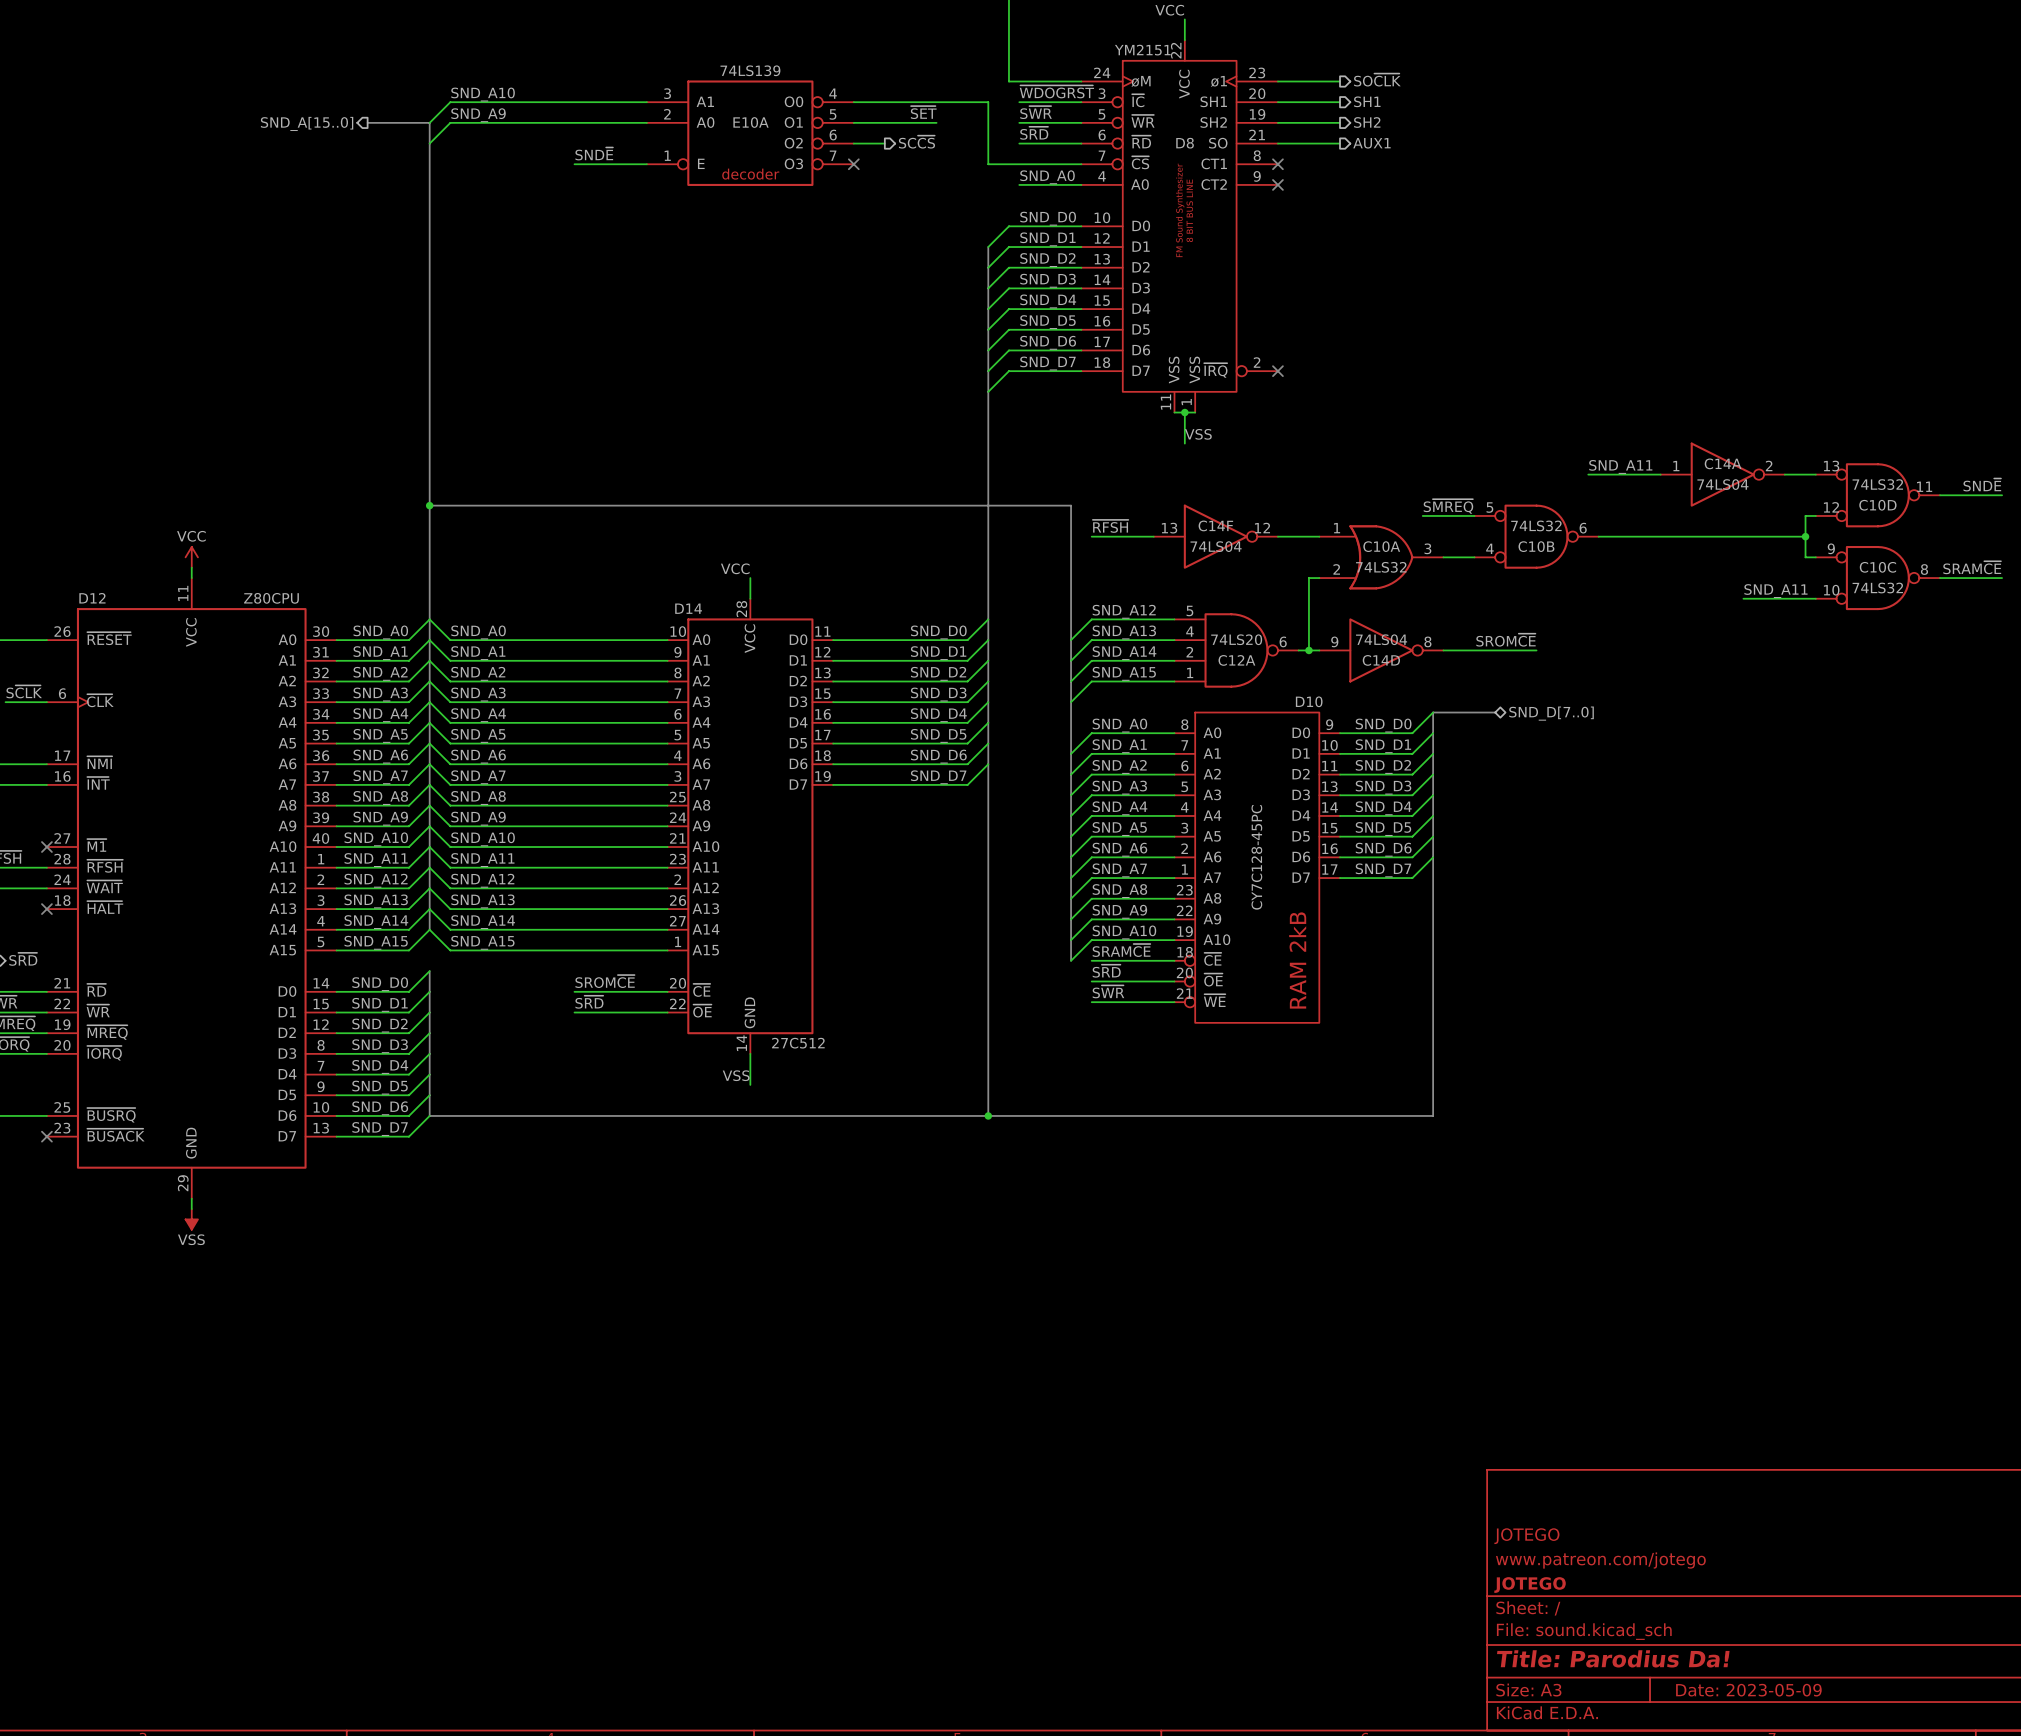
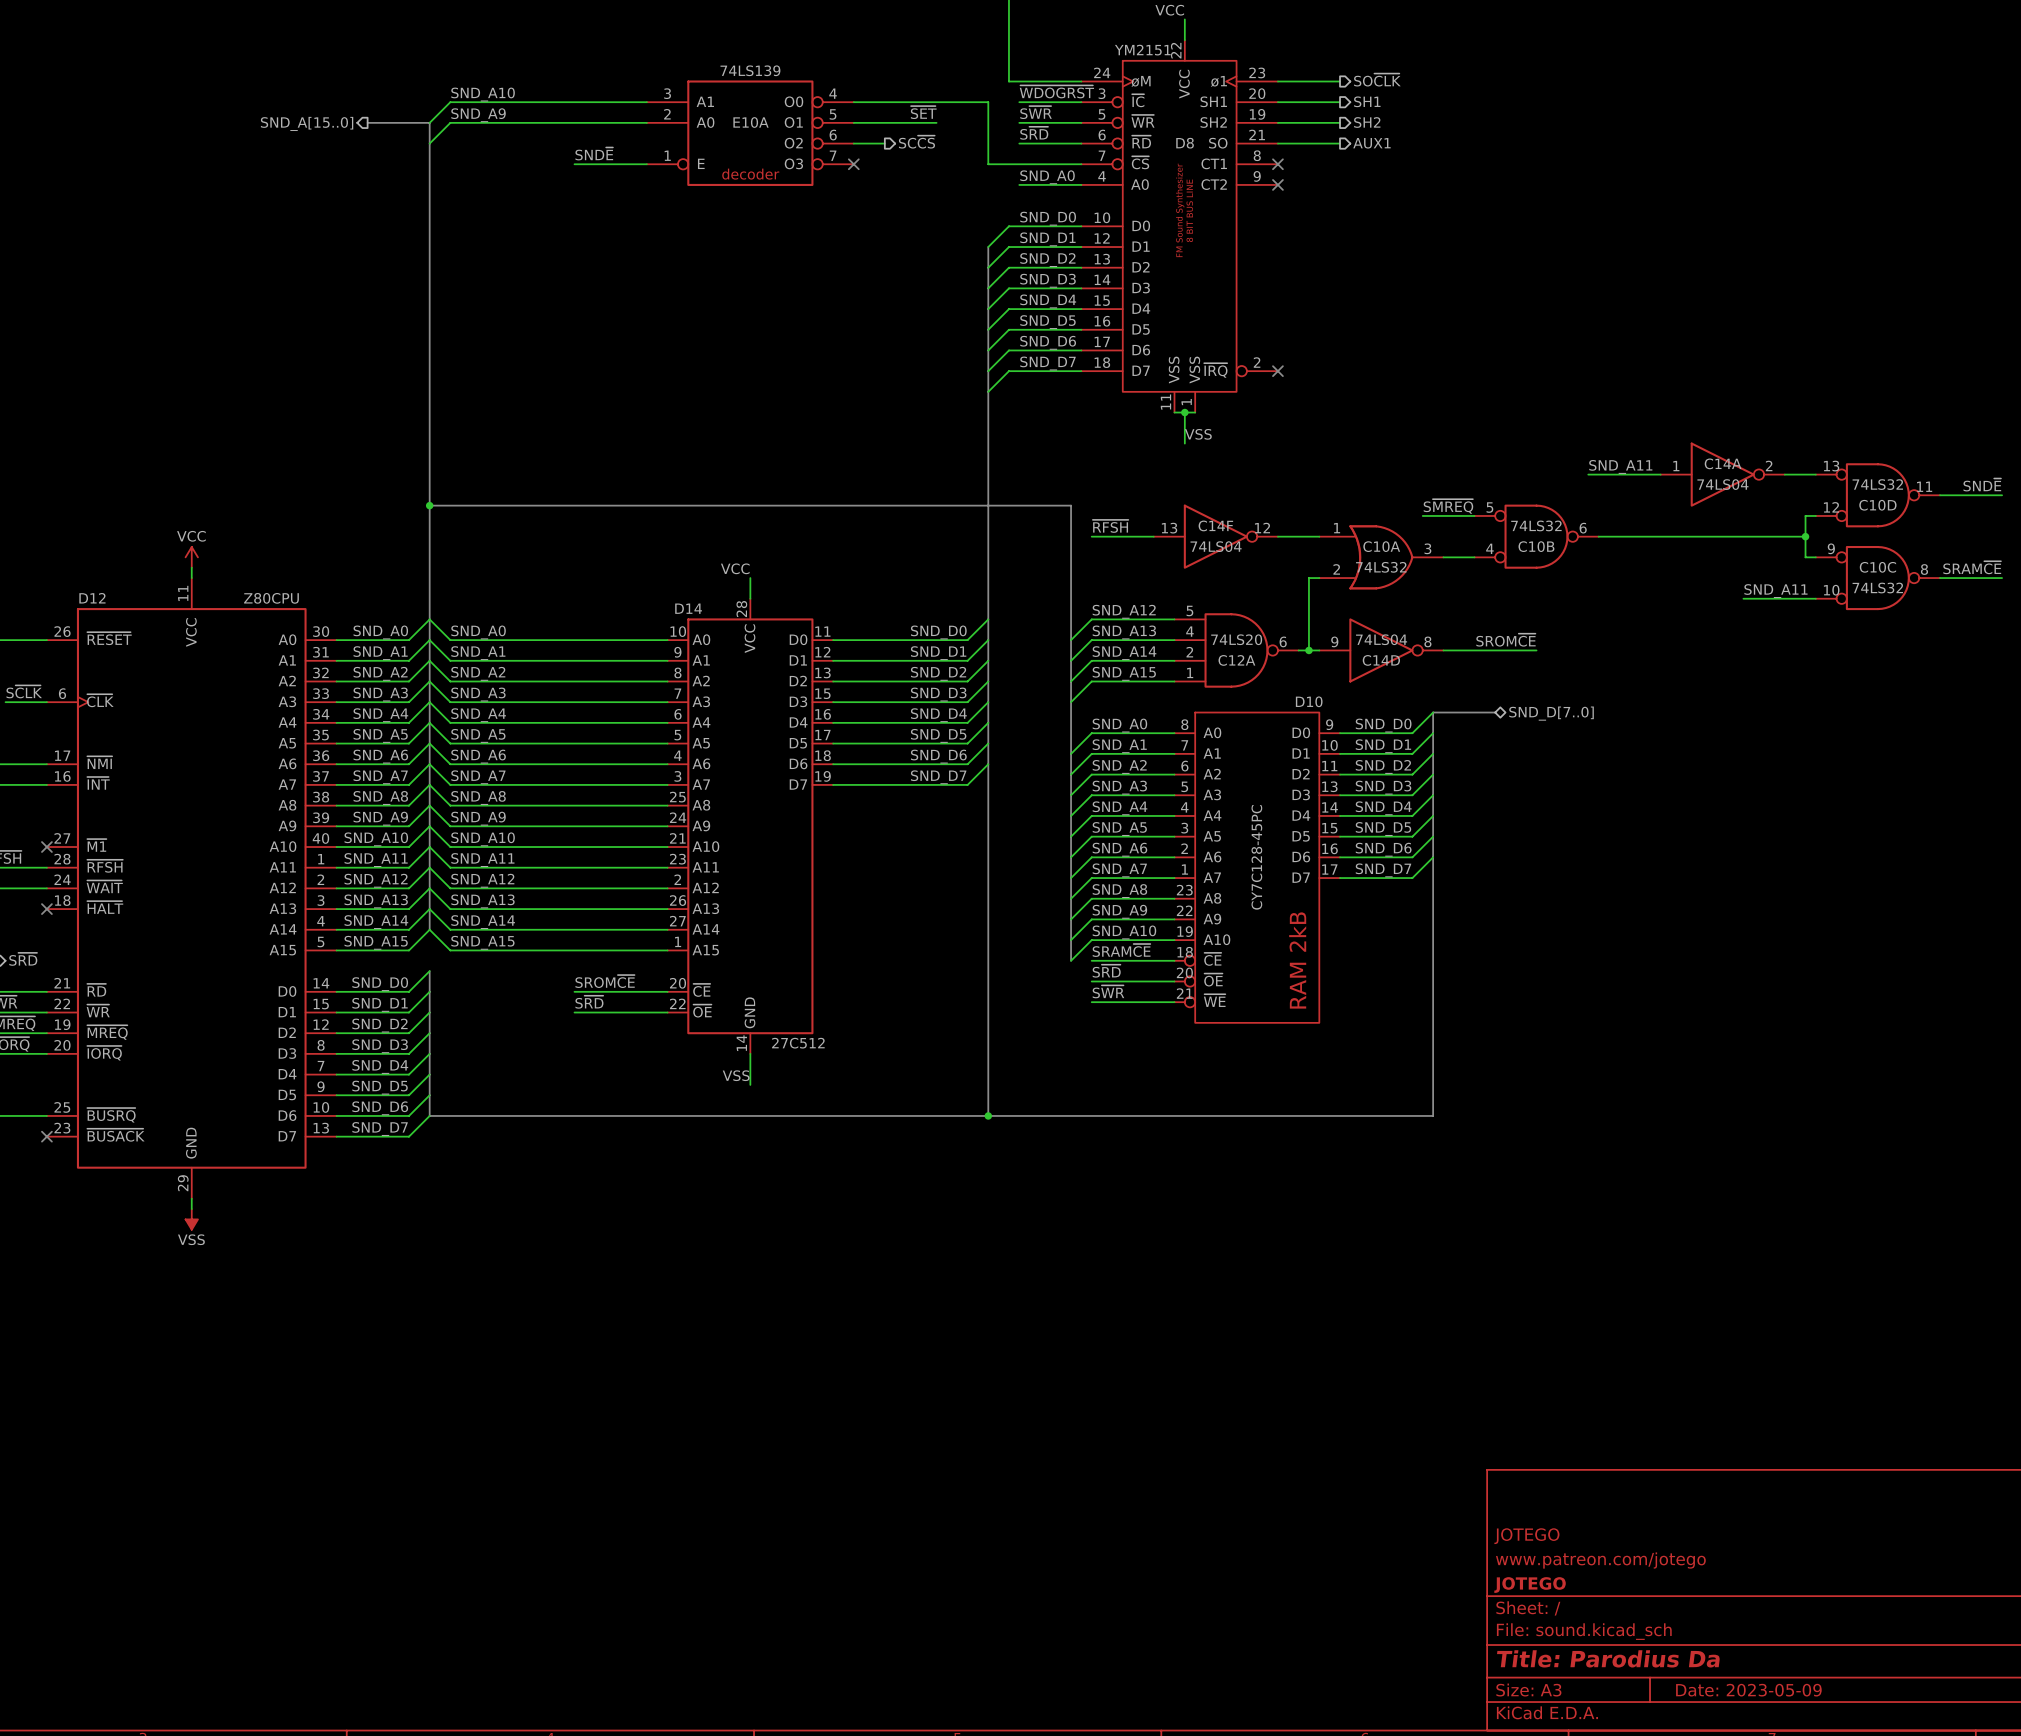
title block: Title: Parodius Da! (1613, 1658) -> Title: Parodius Da (1608, 1658)

